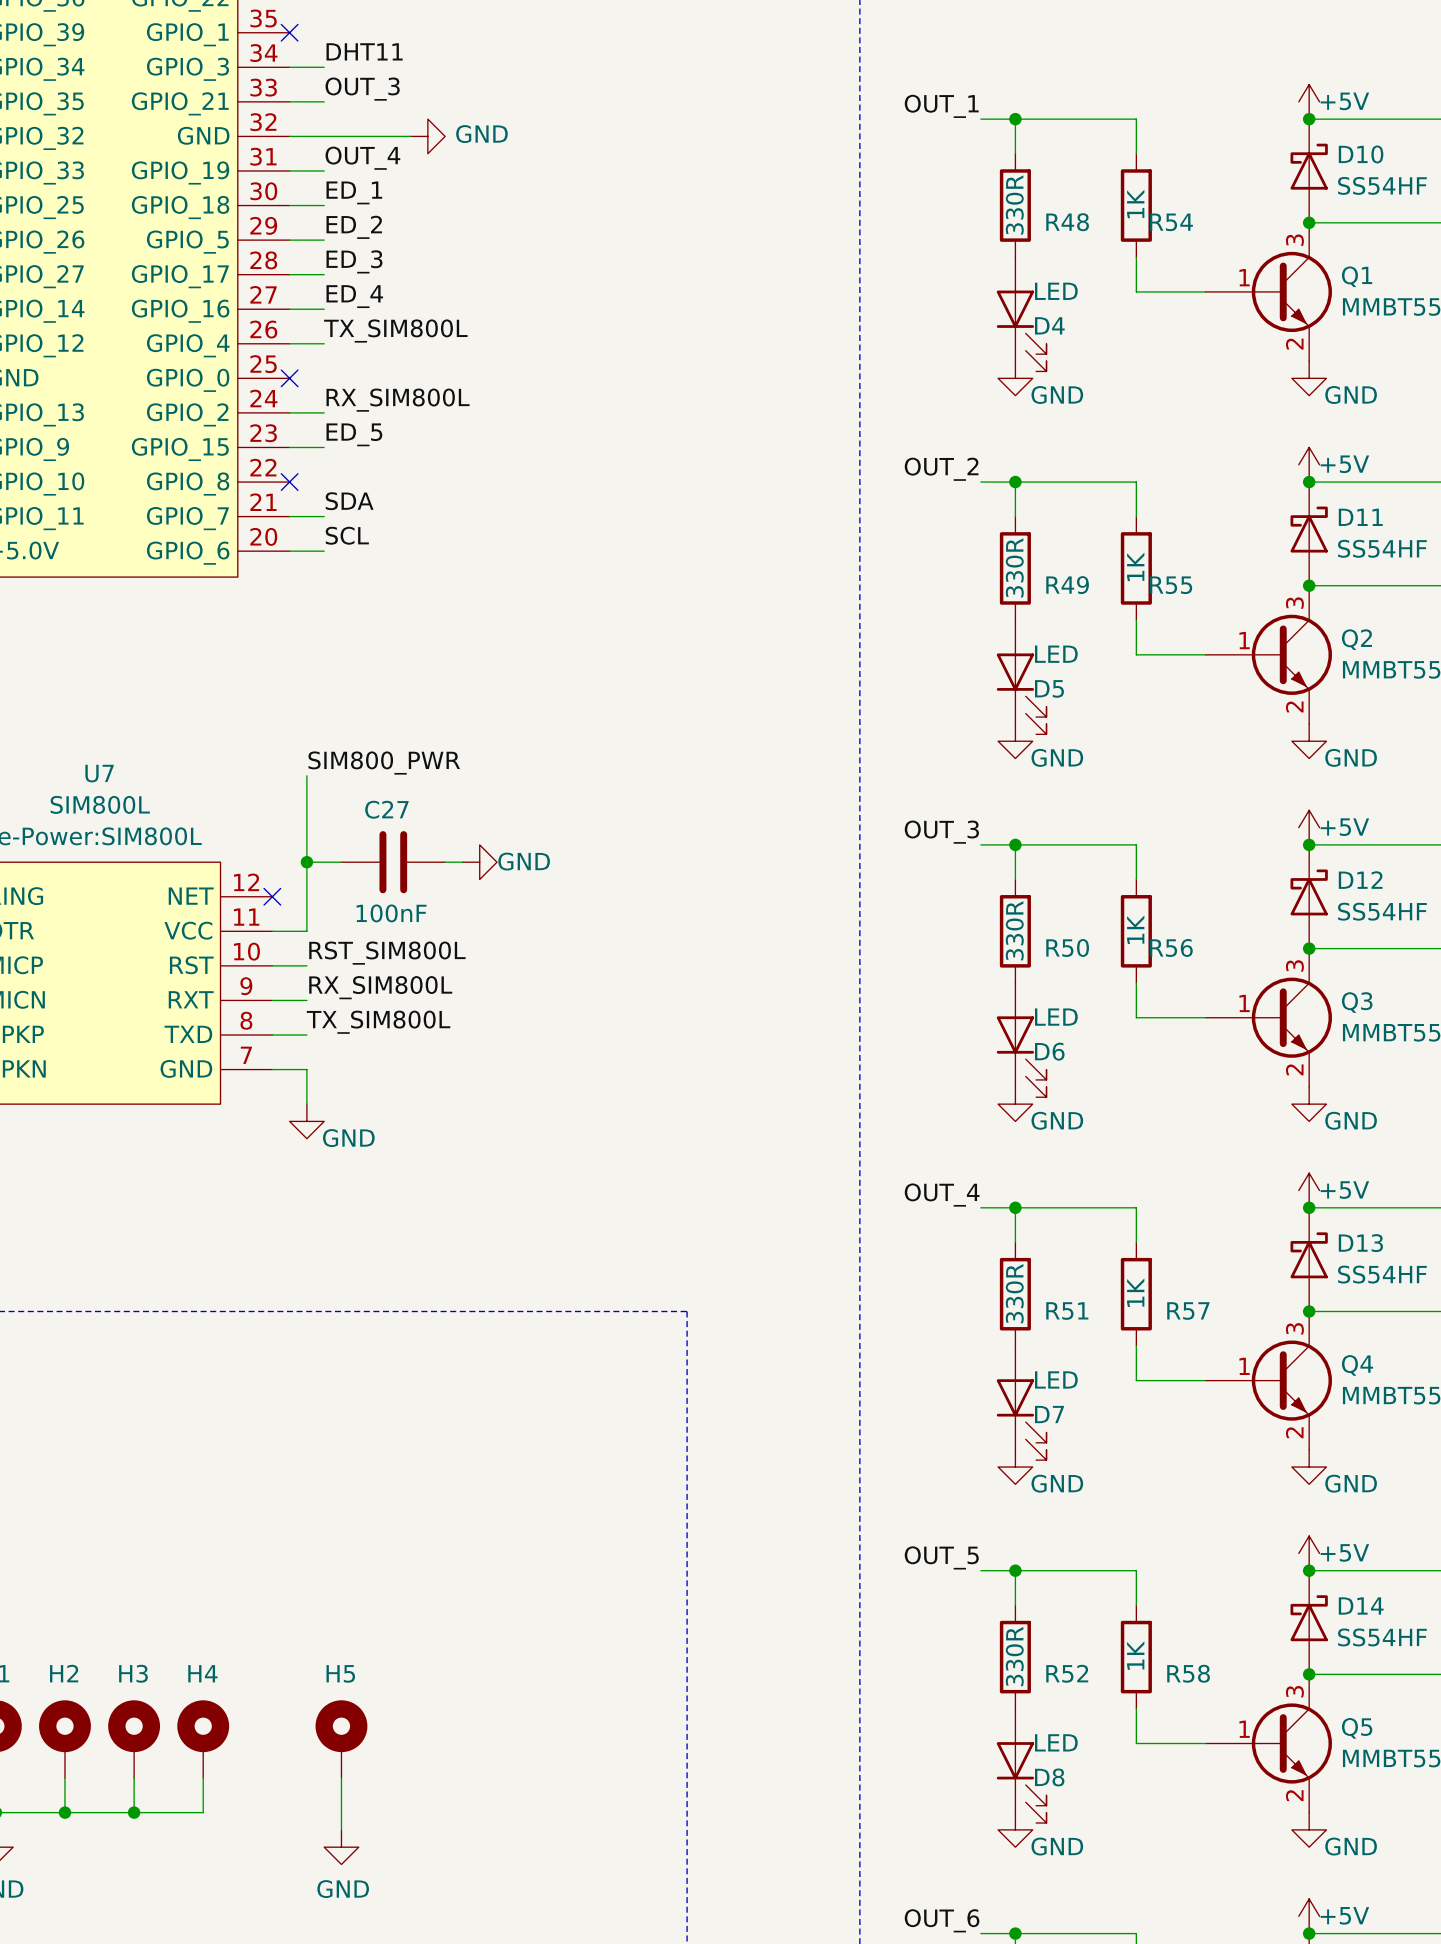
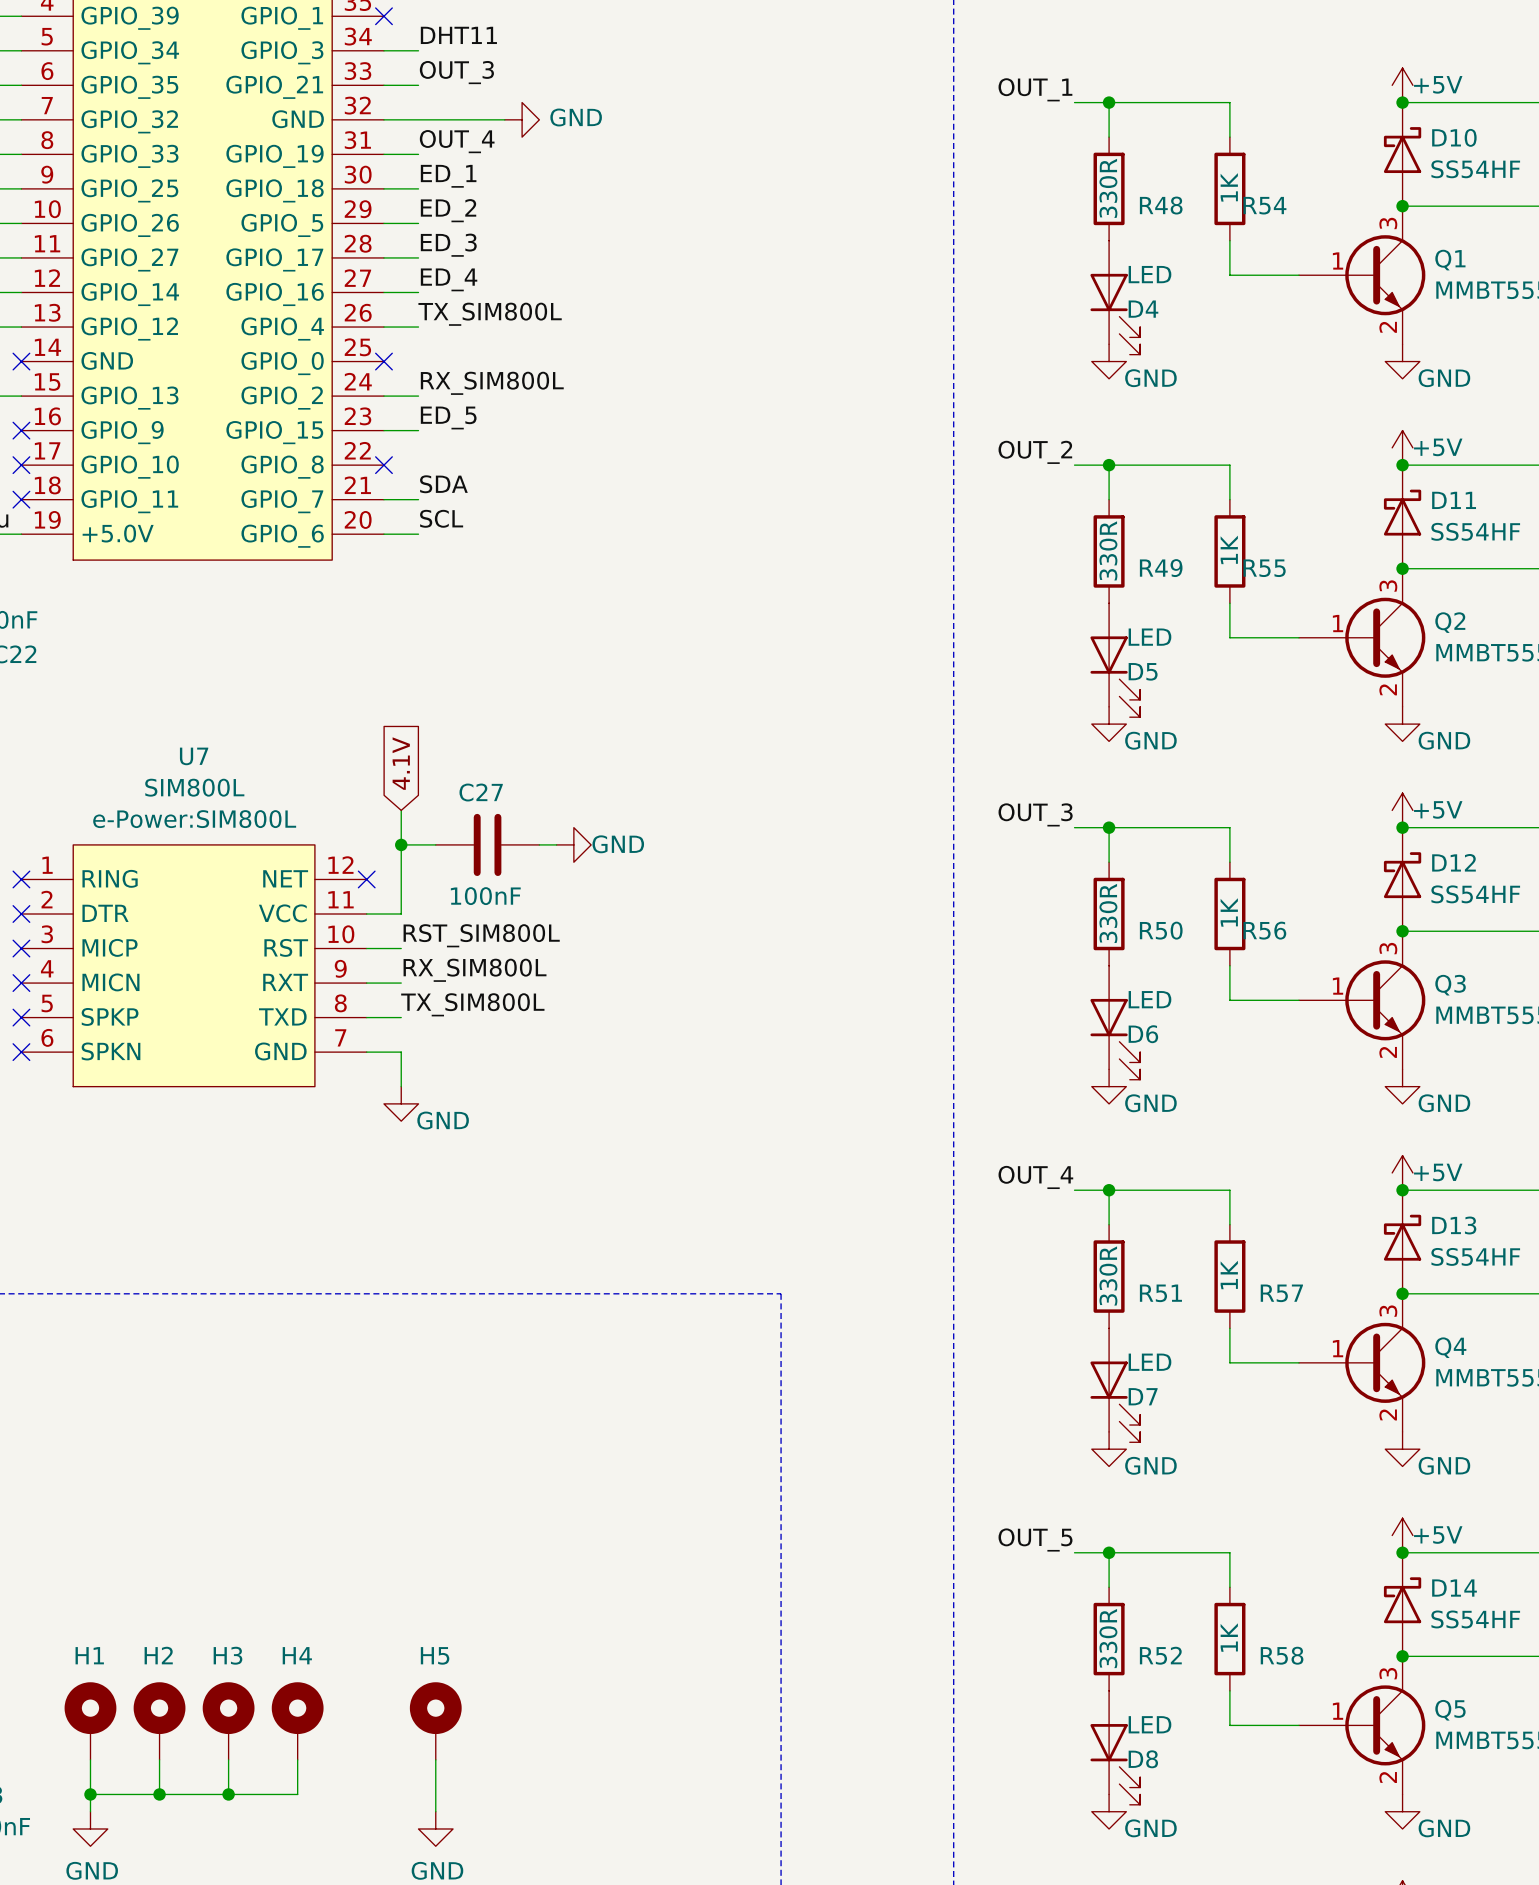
label: SIM800_PWR (384, 763) -> none
wire: (306, 775) (306, 827) -> none
global label: none -> 4.1V (401, 763)

